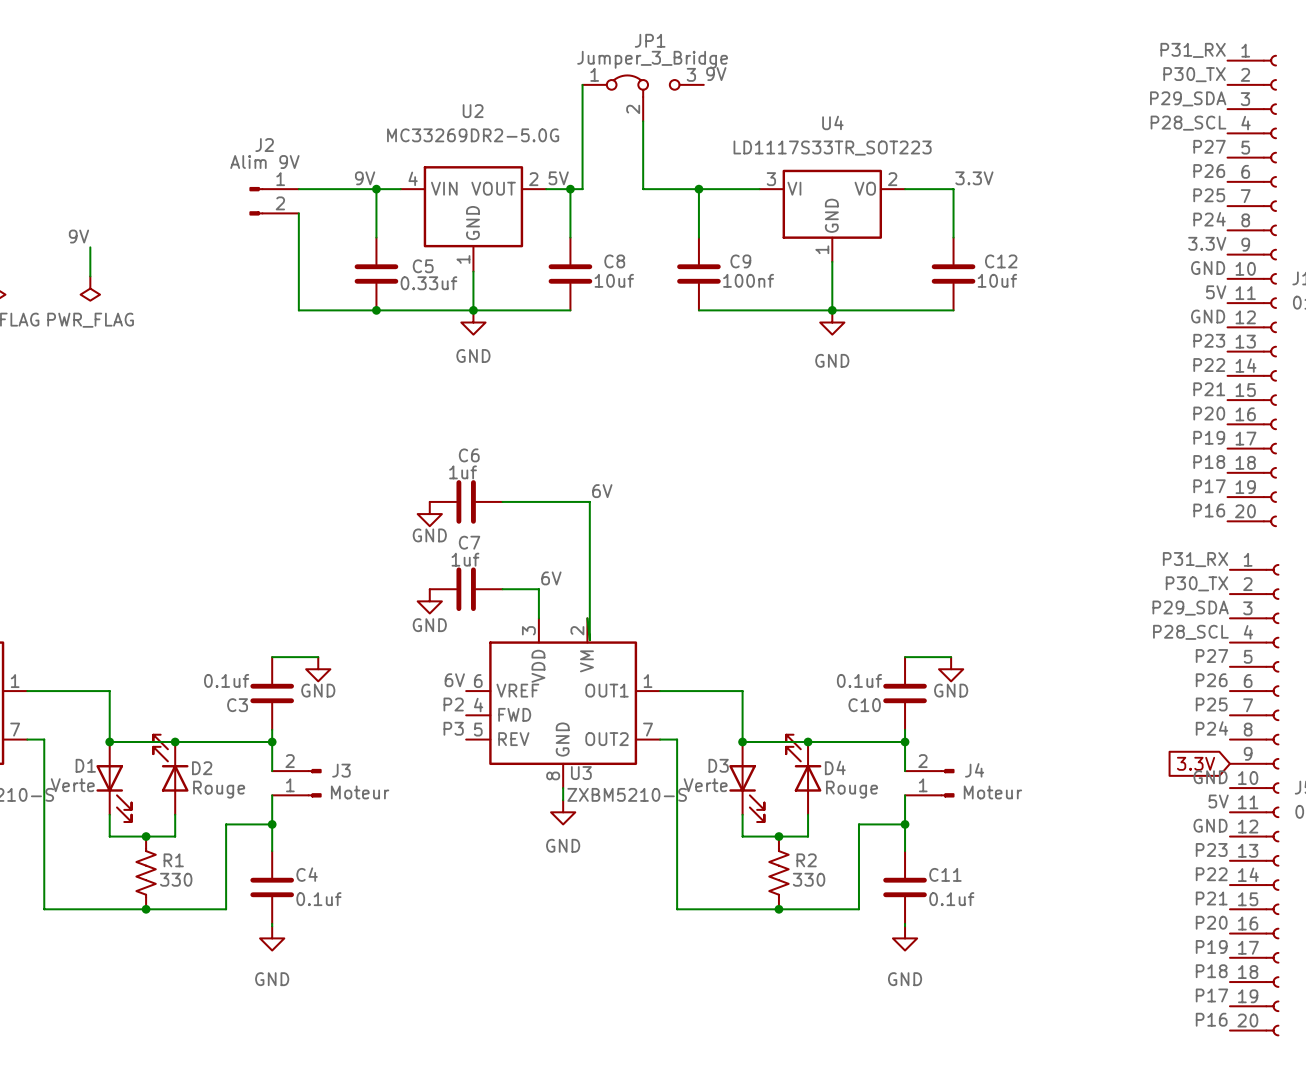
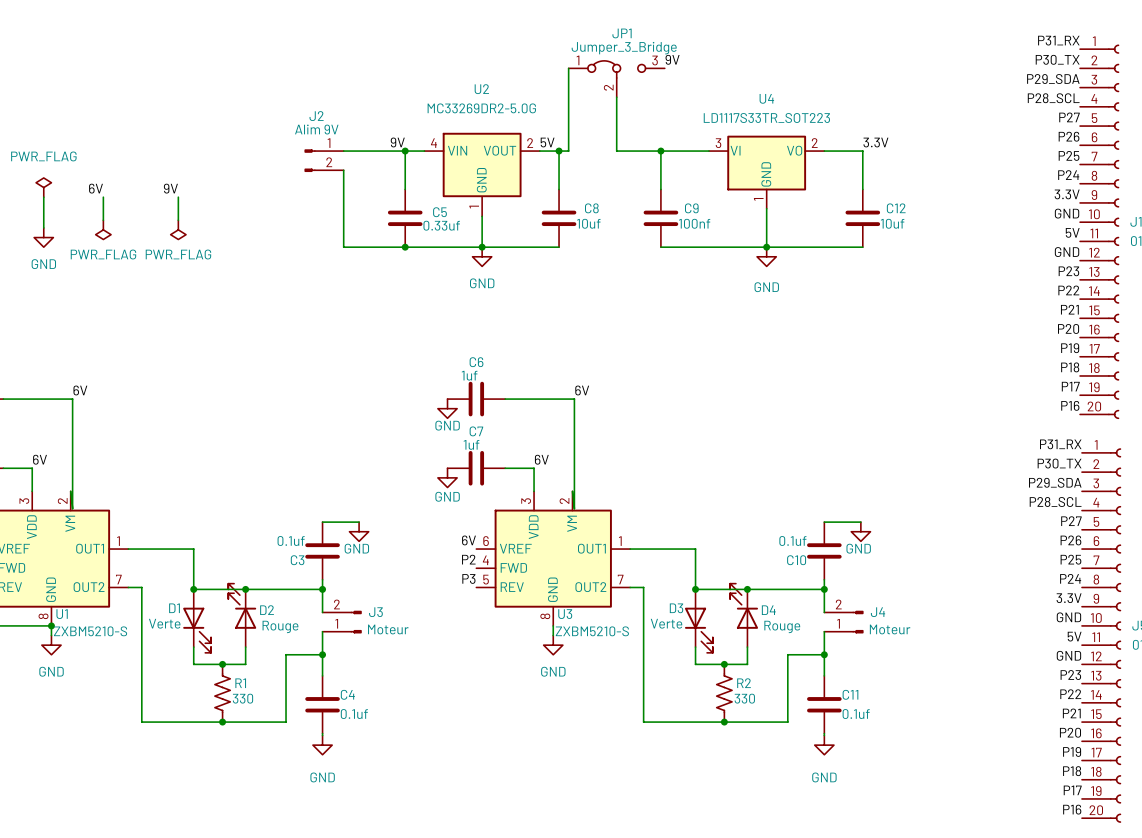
label: none -> 3.3V (1069, 598)
global label: 3.3V (1196, 763) -> none

